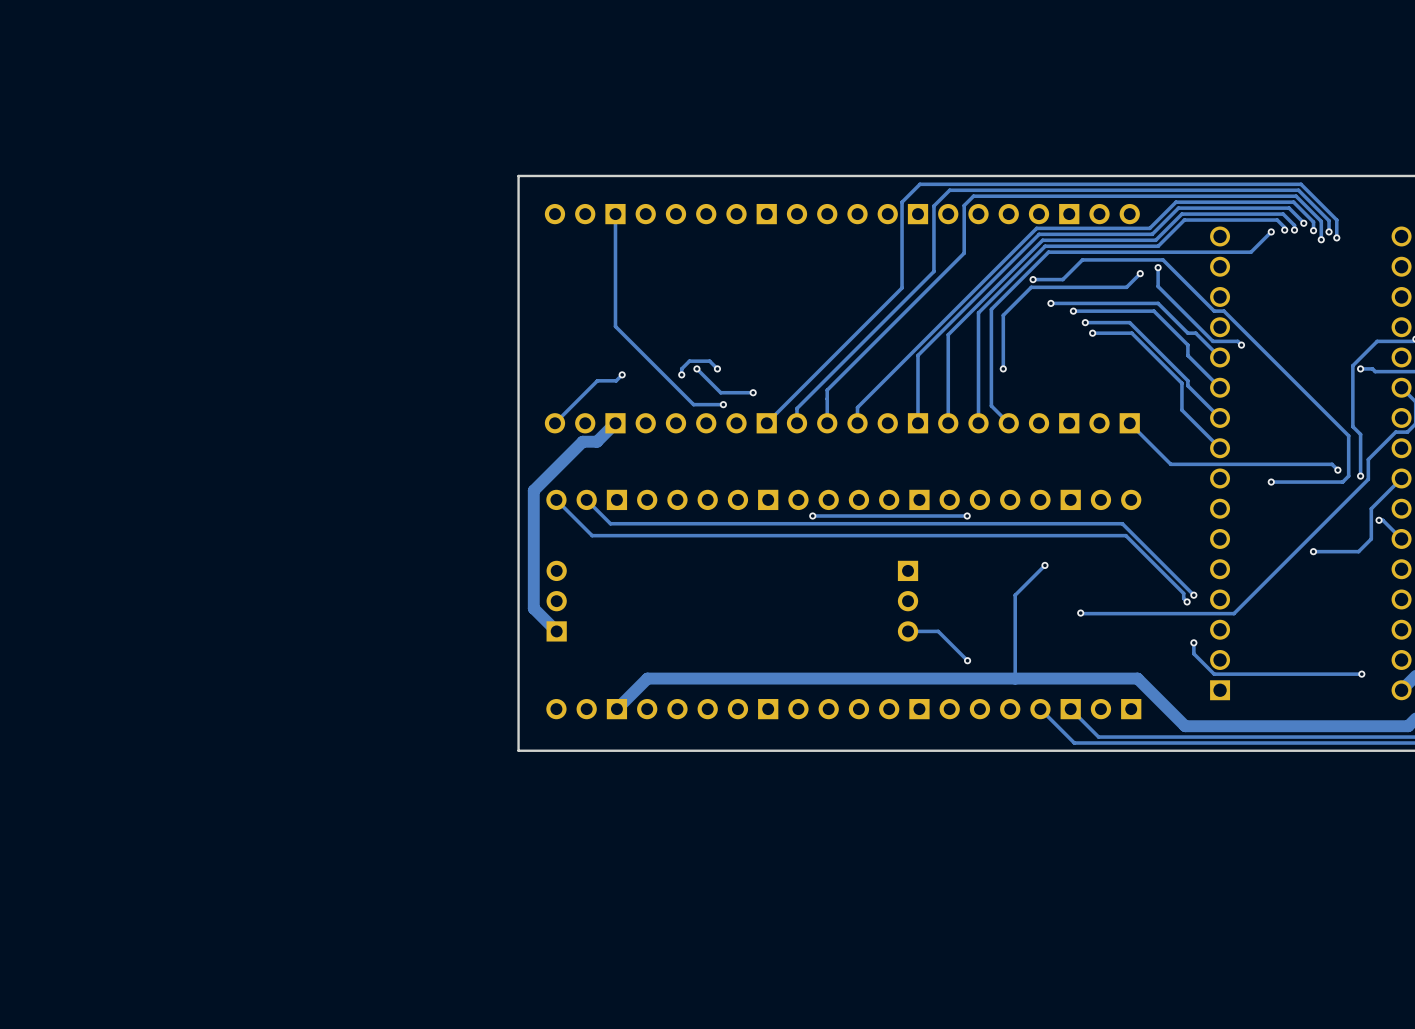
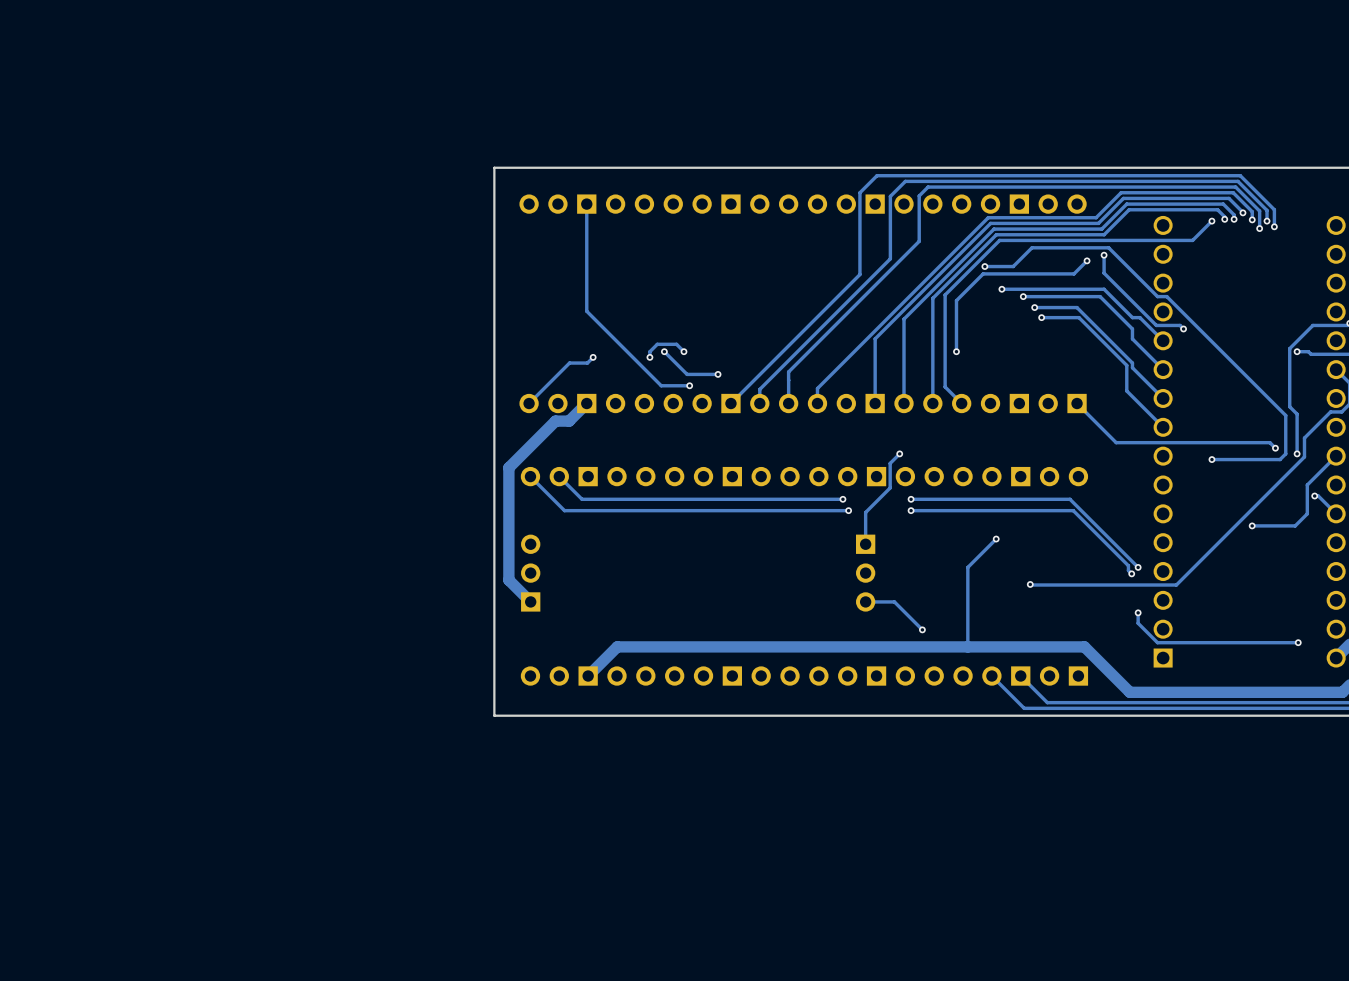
track: none -> (899, 453) (890, 463) (890, 487) (865, 512) (865, 544)
via: none -> (899, 453)
via: (812, 516) -> none
track: (967, 516) (812, 516) -> none
via: (967, 516) -> none
via: none -> (842, 499)
track: (955, 523) (884, 523) -> none
via: none -> (911, 499)
via: none -> (848, 510)
track: (955, 535) (890, 535) -> none
via: none -> (911, 510)

